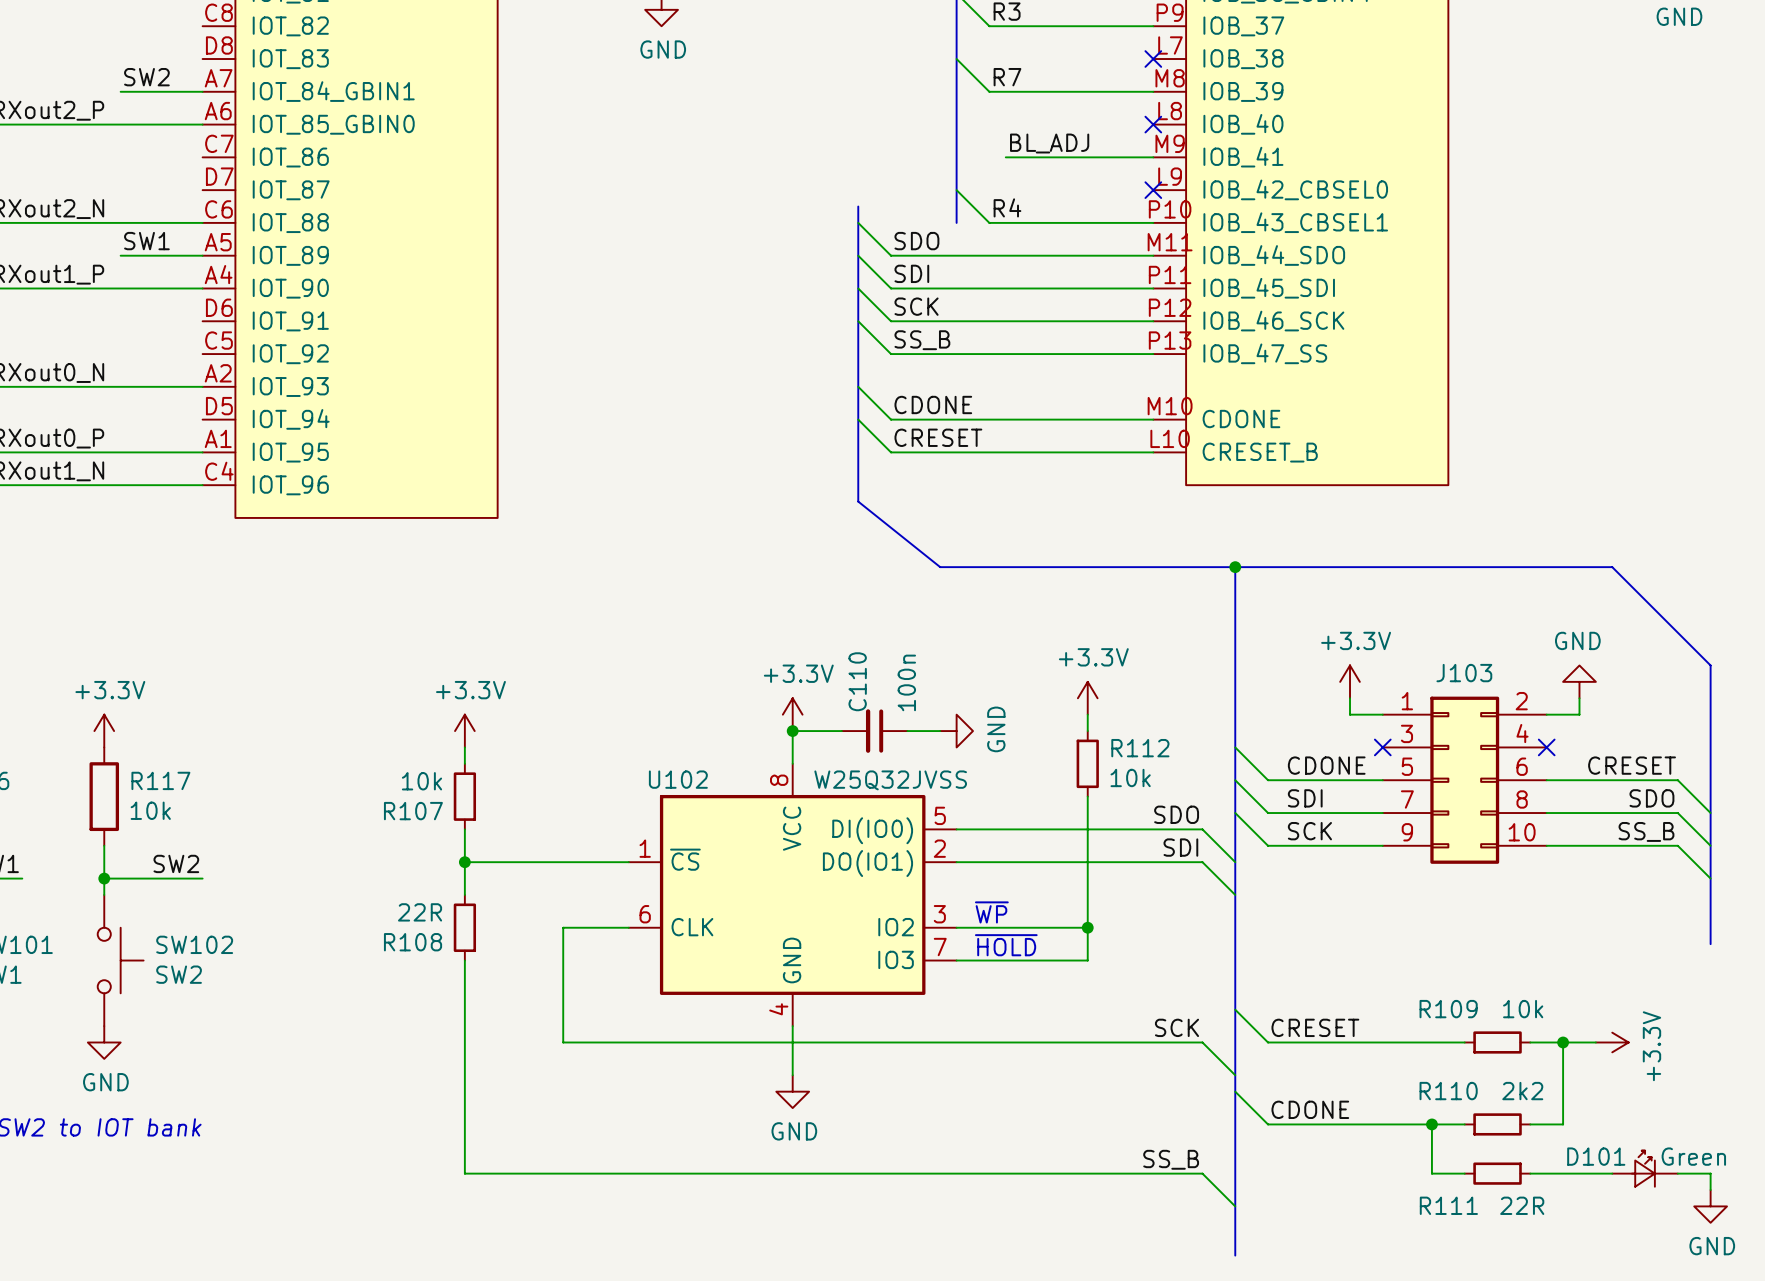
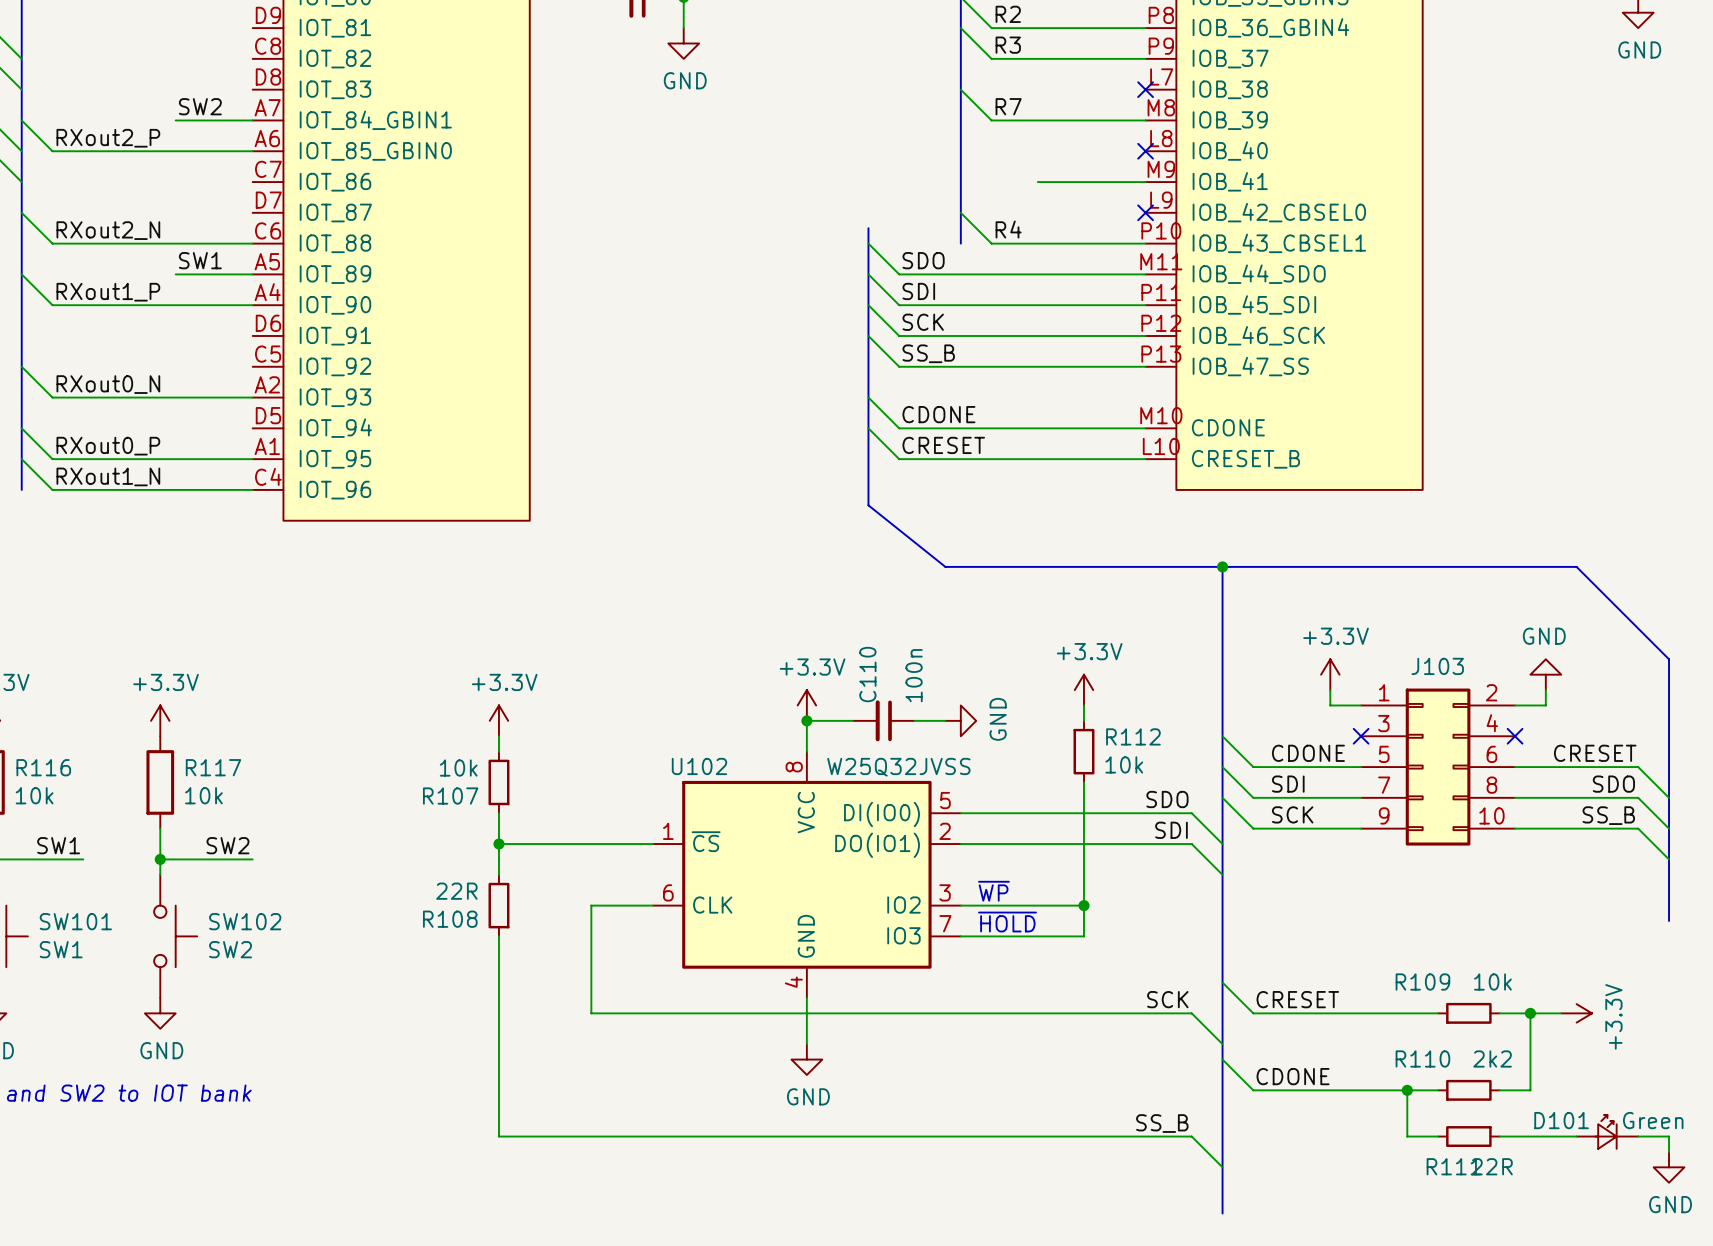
label: BL_ADJ (1049, 143) -> none
wire: (1005, 157) (1038, 157) -> none
R111 name position: R111 (1448, 1205) -> R111 (1453, 1166)

